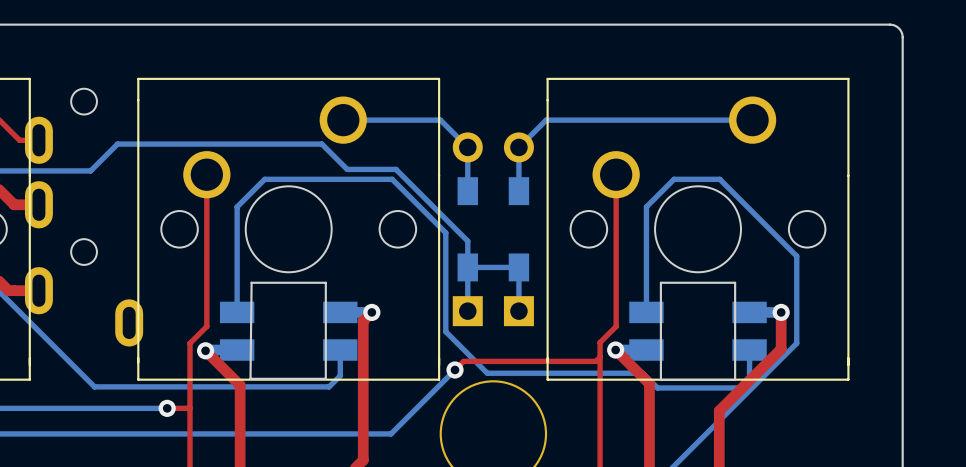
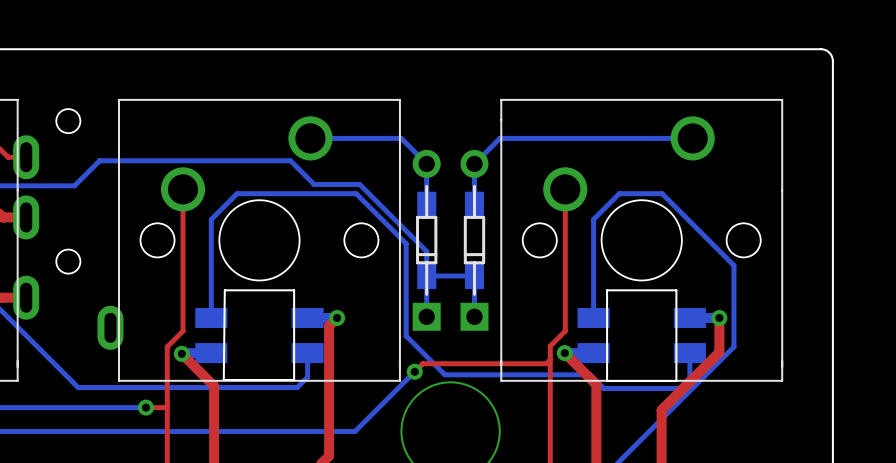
part footprint: [452, 132, 483, 327] -> [412, 149, 441, 331]
part footprint: [503, 132, 534, 327] -> [460, 149, 489, 331]

